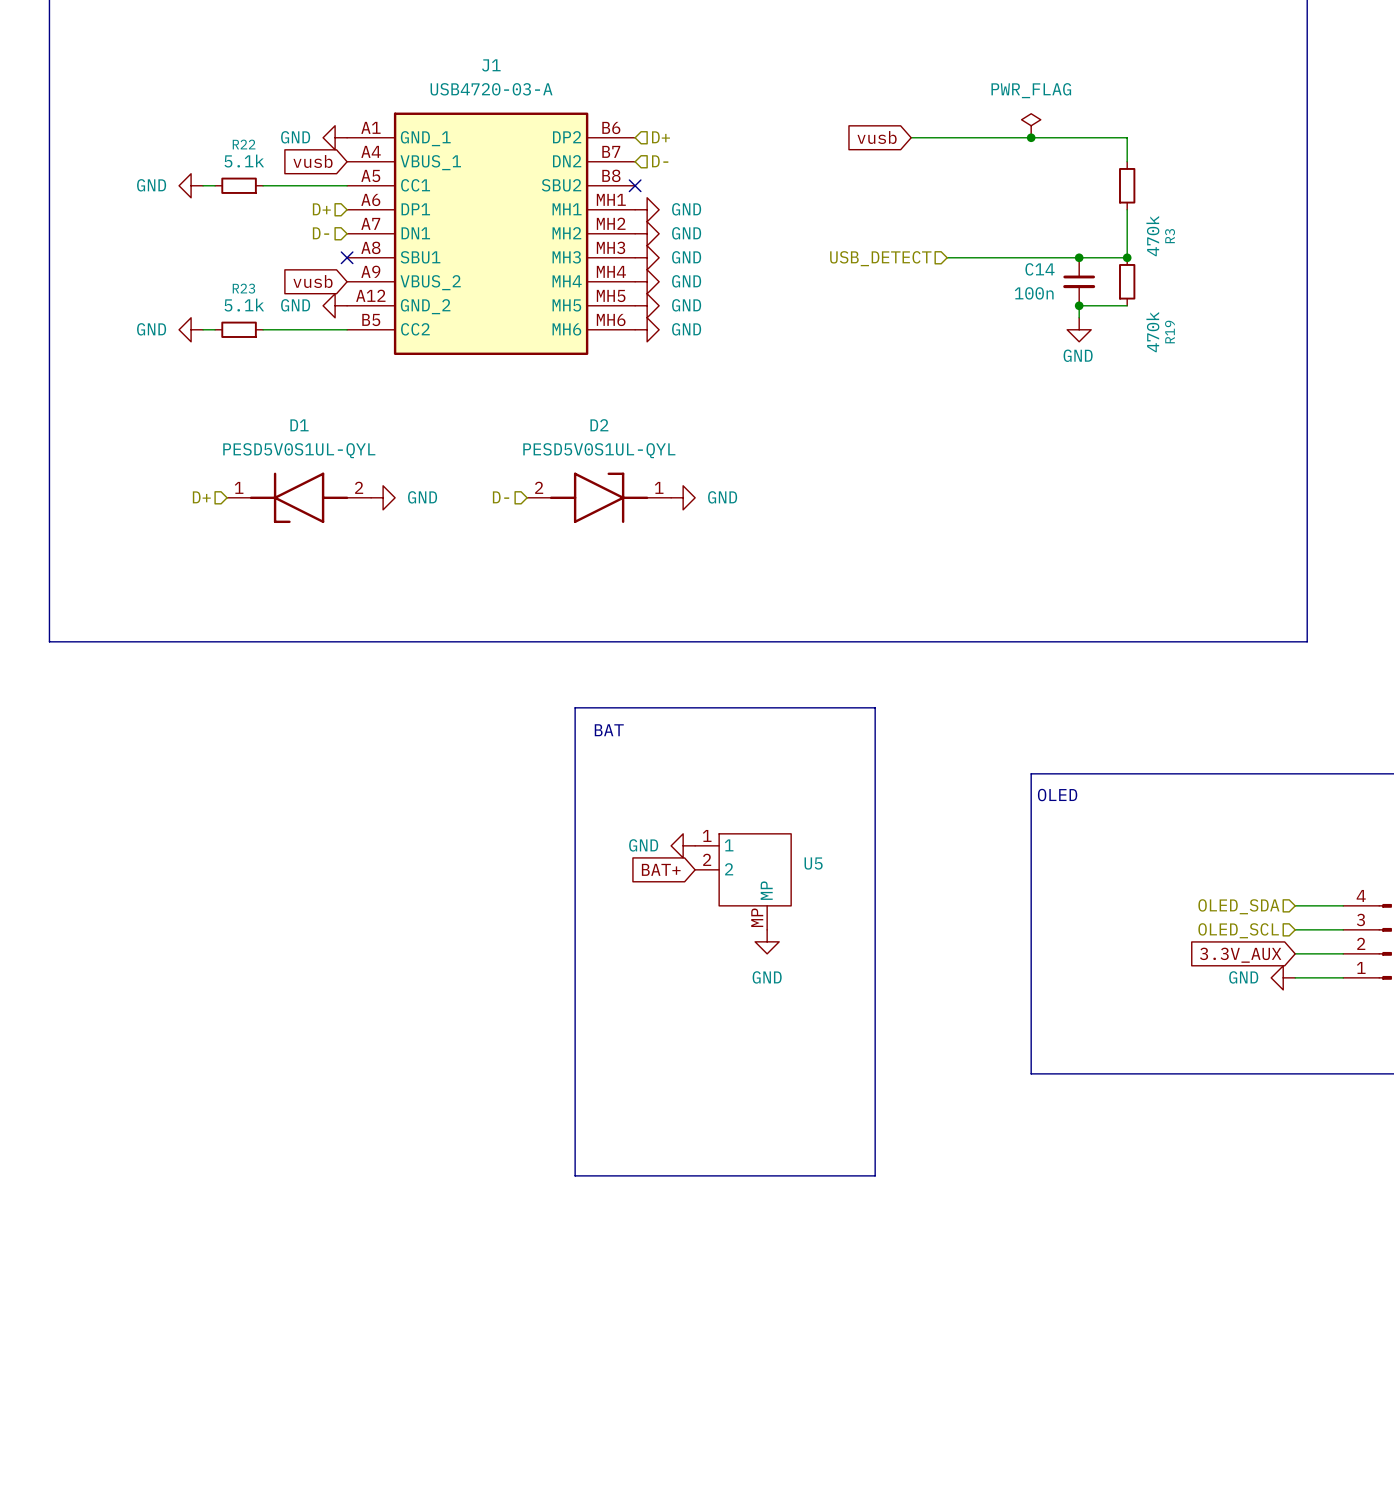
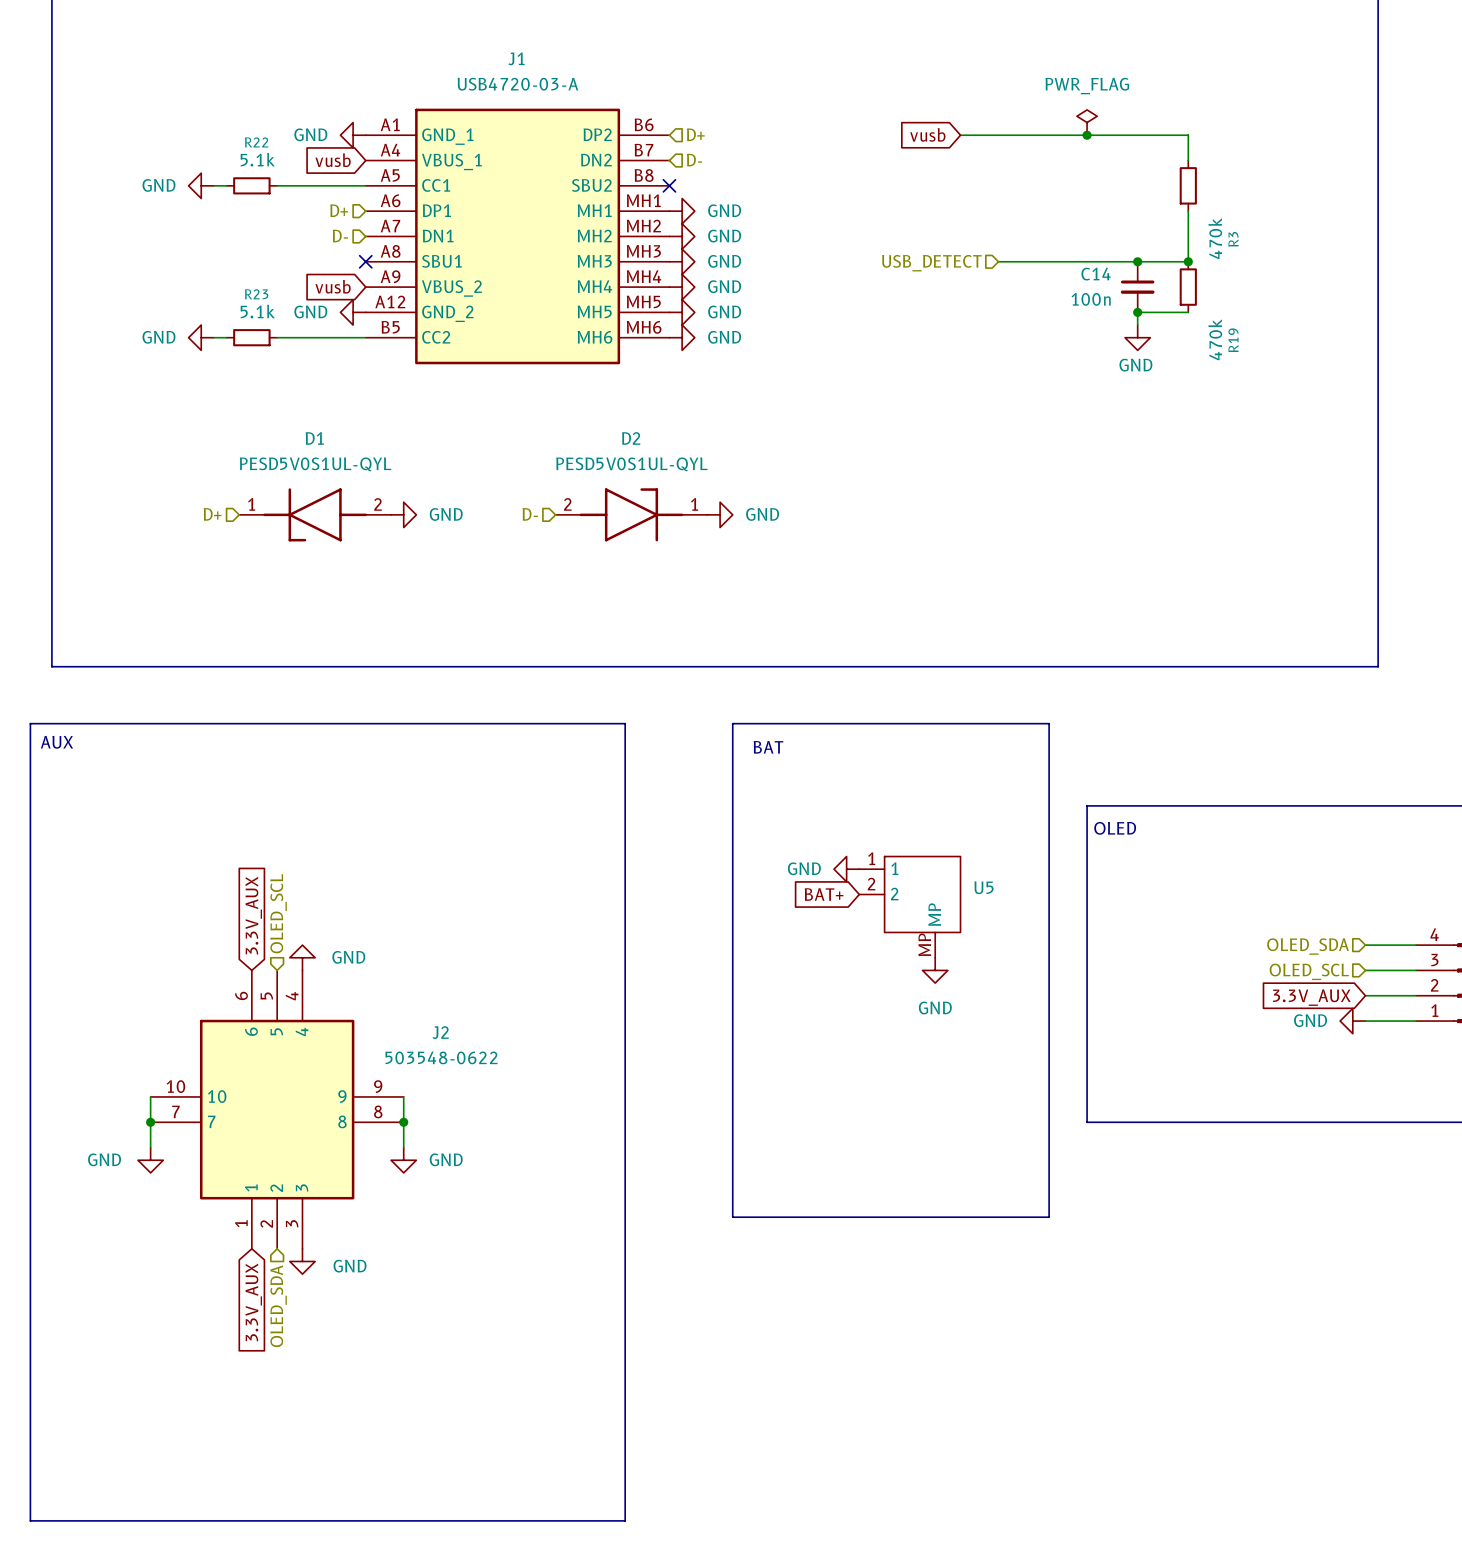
line: none -> (30, 723) (625, 723) (625, 1520) (30, 1520) (30, 723)
line: (575, 707) (875, 707) (875, 1175) (575, 1175) (575, 707) -> (732, 723) (1049, 723) (1049, 1217) (732, 1217) (732, 723)
text: none -> AUX (56, 742)
text position: BAT (609, 730) -> BAT (768, 747)
power symbol: none -> GND (846, 869)
power symbol: GND (683, 845) -> none
global label position: BAT+ (661, 869) -> BAT+ (824, 894)
hierarchical label: none -> OLED_SCL (278, 913)
global label: none -> 3.3V_AUX (253, 915)
U5 position: (743, 881) -> (909, 907)
power symbol: none -> GND (302, 957)
power symbol: none -> GND (935, 970)
power symbol: GND (767, 941) -> none
wire: none -> (150, 1096) (150, 1147)
wire: none -> (403, 1096) (403, 1147)
J2: none -> 503548-0622 (277, 1109)
junction: none -> (150, 1122)
junction: none -> (403, 1122)
power symbol: none -> GND (150, 1160)
power symbol: none -> GND (403, 1160)
power symbol: none -> GND (302, 1261)
global label: none -> 3.3V_AUX (253, 1302)
hierarchical label: none -> OLED_SDA (278, 1306)

